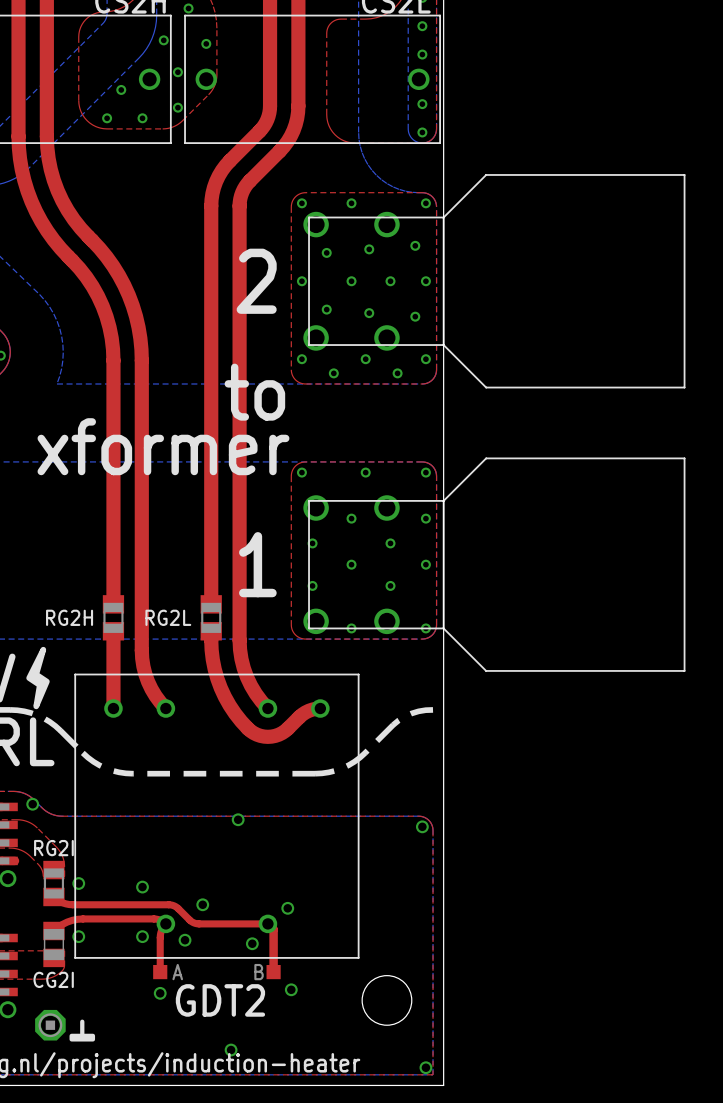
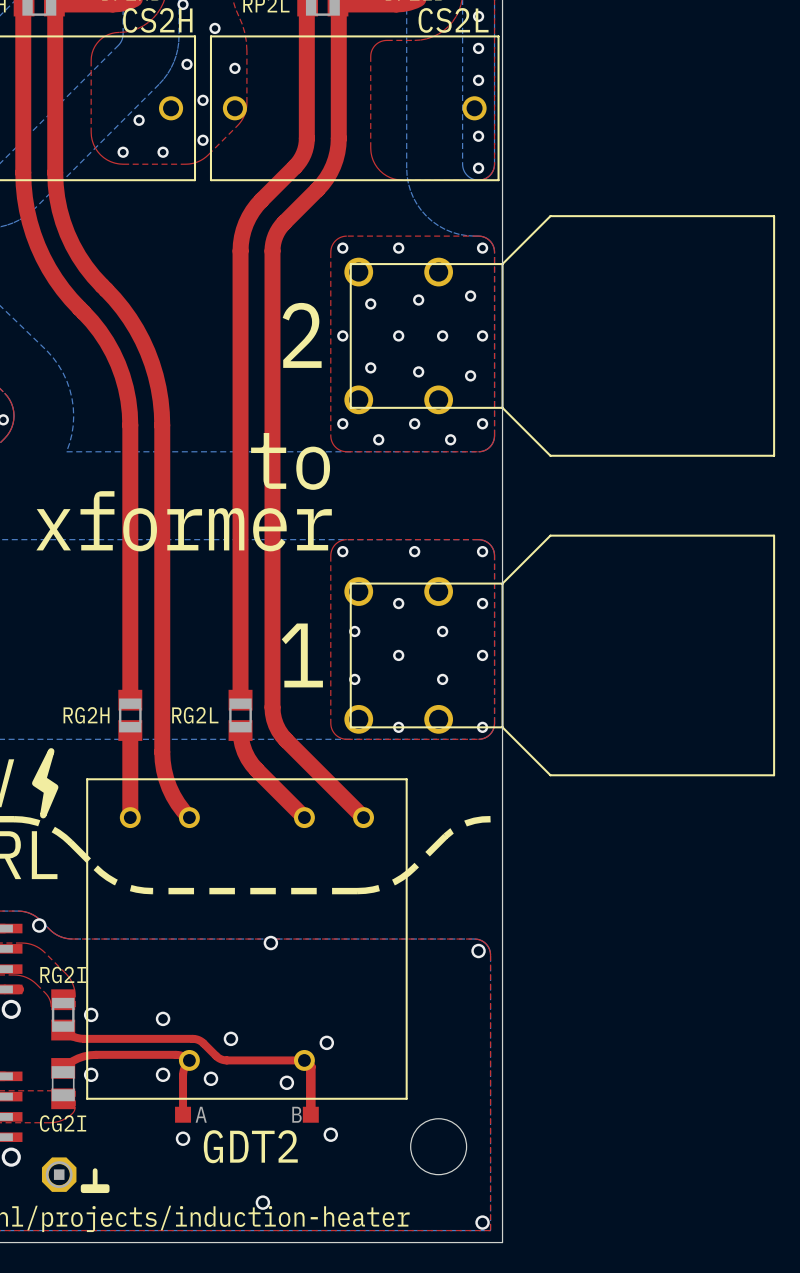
top track: (239, 610) (240, 649) (243, 668) (255, 693) (267, 708) -> (240, 730) (242, 745) (252, 764) (304, 817)
top track: (211, 631) (212, 659) (220, 687) (235, 713) (250, 730) (260, 735) (275, 735) (285, 730) (305, 712) (320, 708) -> (272, 707) (274, 719) (282, 735) (363, 817)

